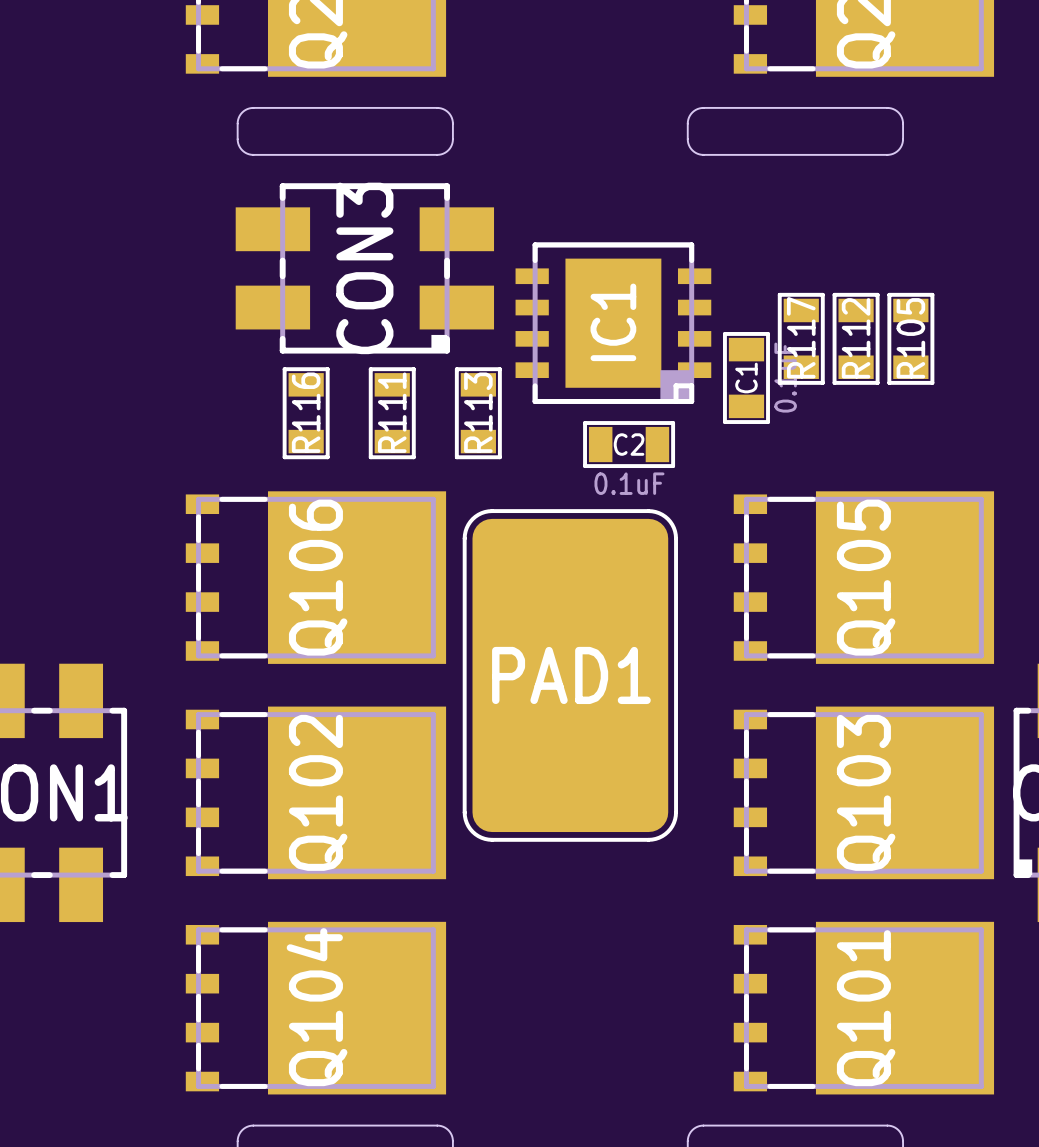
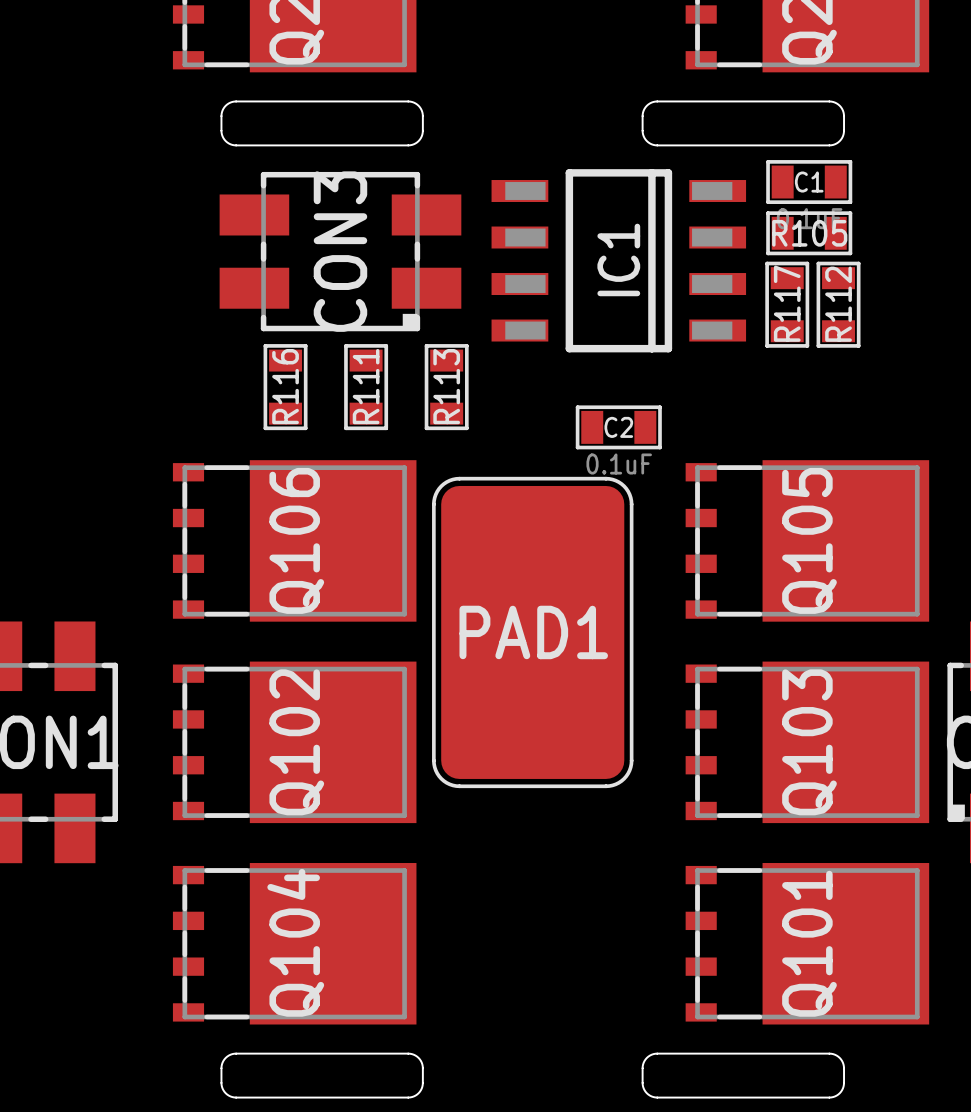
IC1 footprint: [515, 242, 712, 404] -> [491, 169, 747, 353]
R117 position: (801, 338) -> (787, 304)
R112 position: (856, 338) -> (838, 304)
R105 rotation: 0° (910, 338) -> 90° clockwise (809, 233)
R105 position: (910, 338) -> (809, 233)
C1 rotation: 0° (746, 377) -> 90° clockwise (809, 182)
C1 position: (746, 377) -> (809, 182)
C2 position: (629, 444) -> (618, 427)

